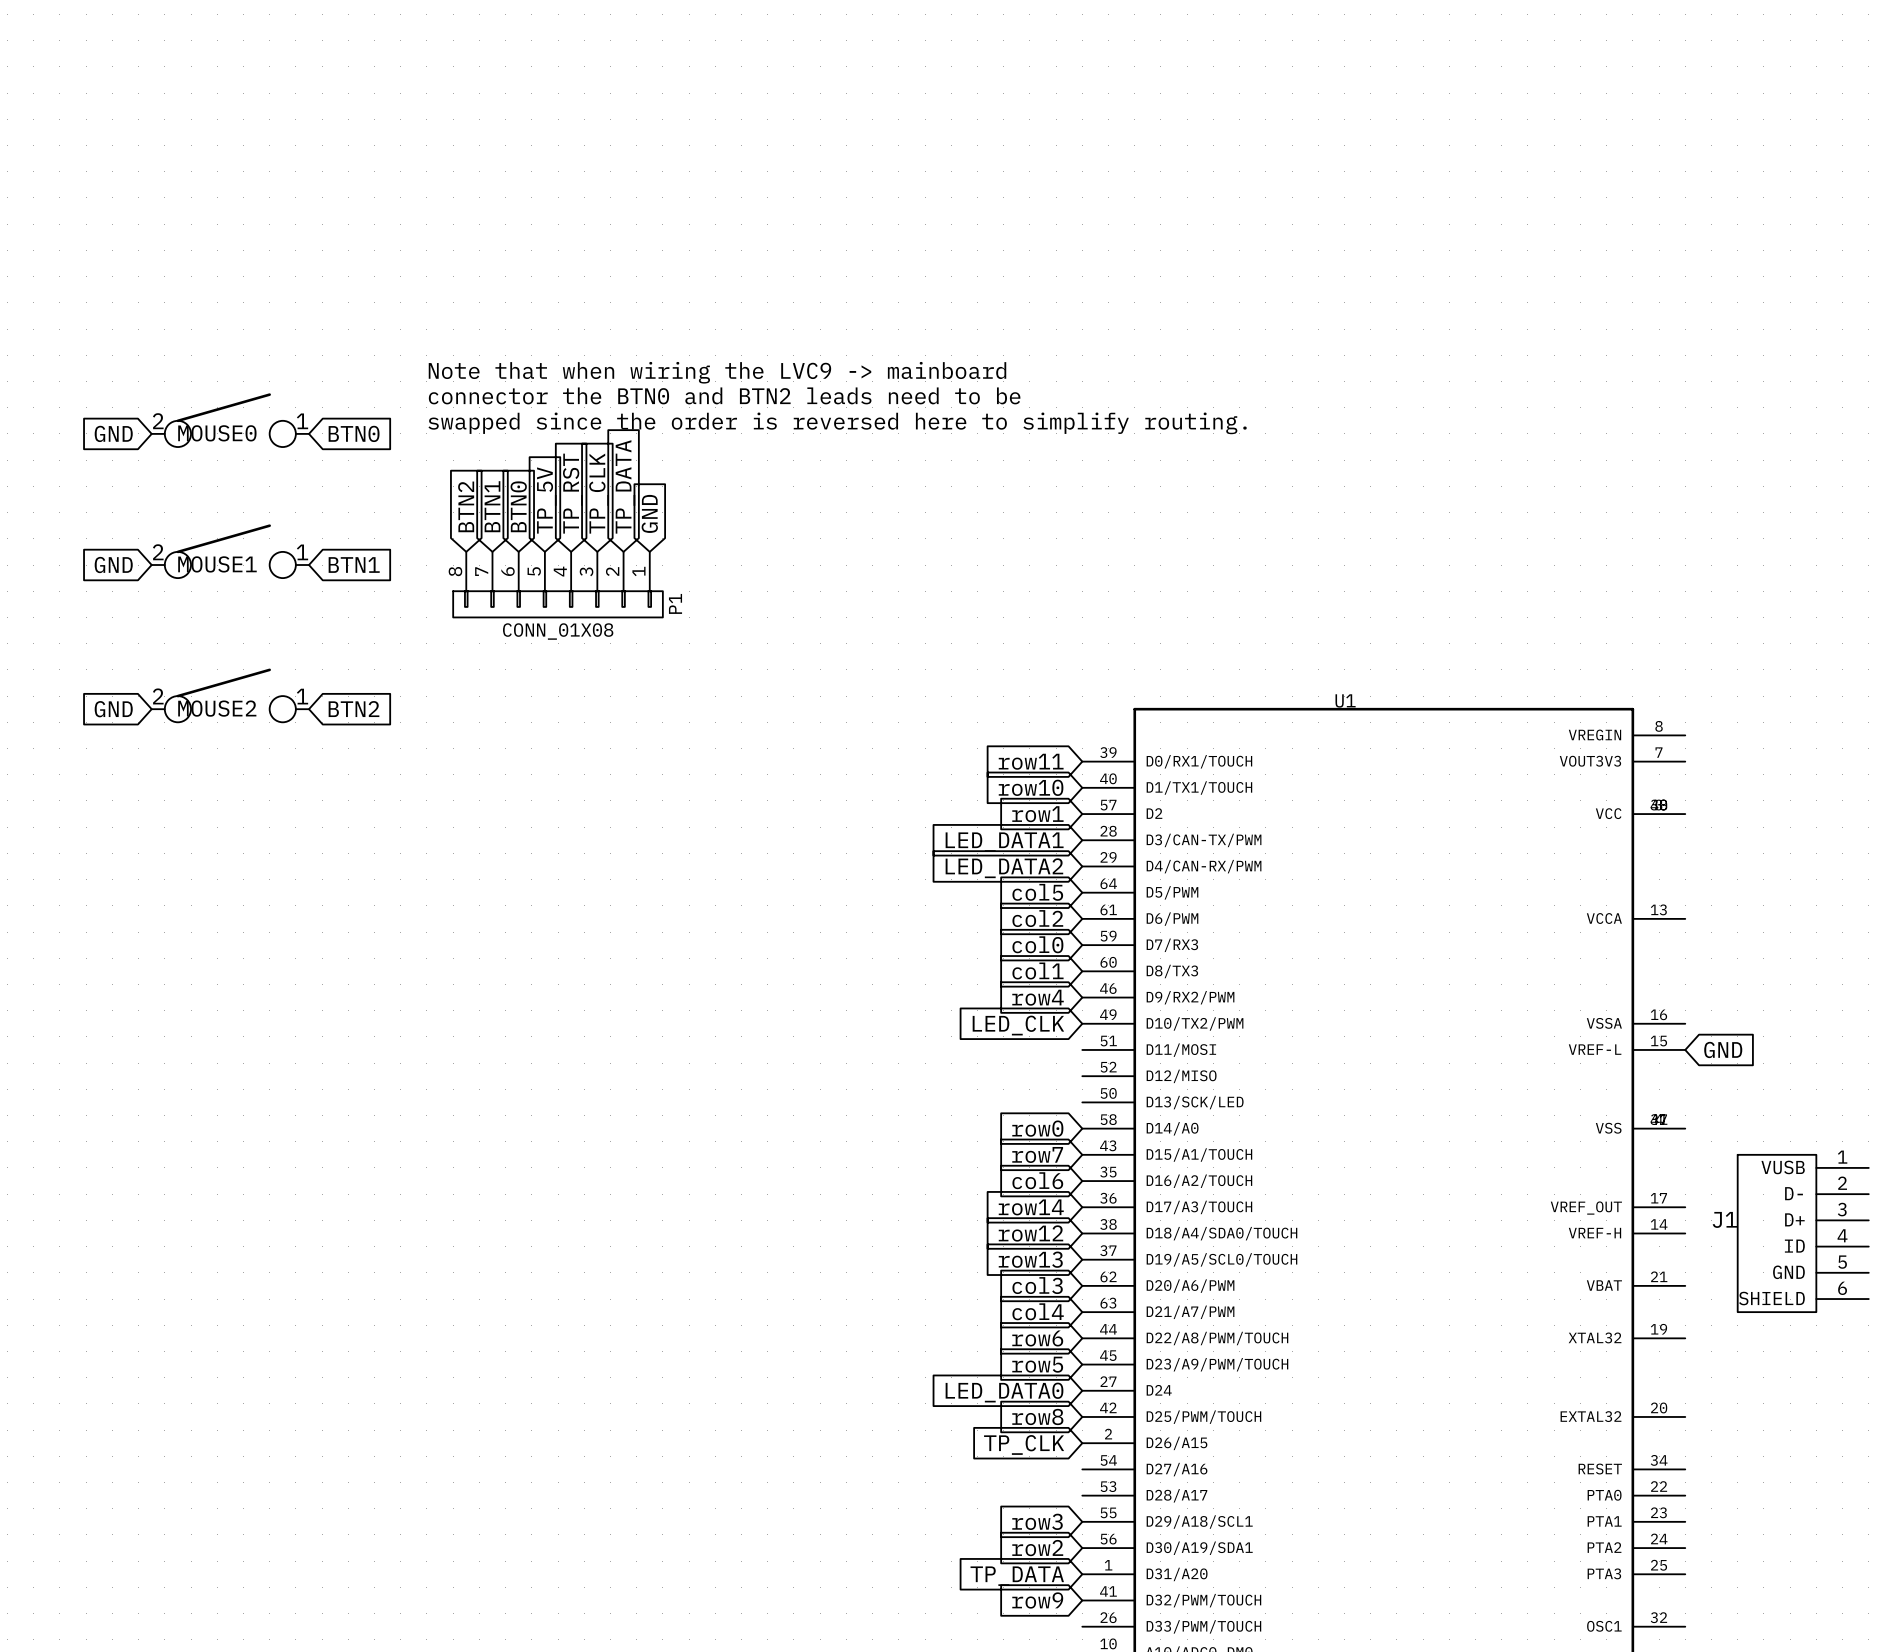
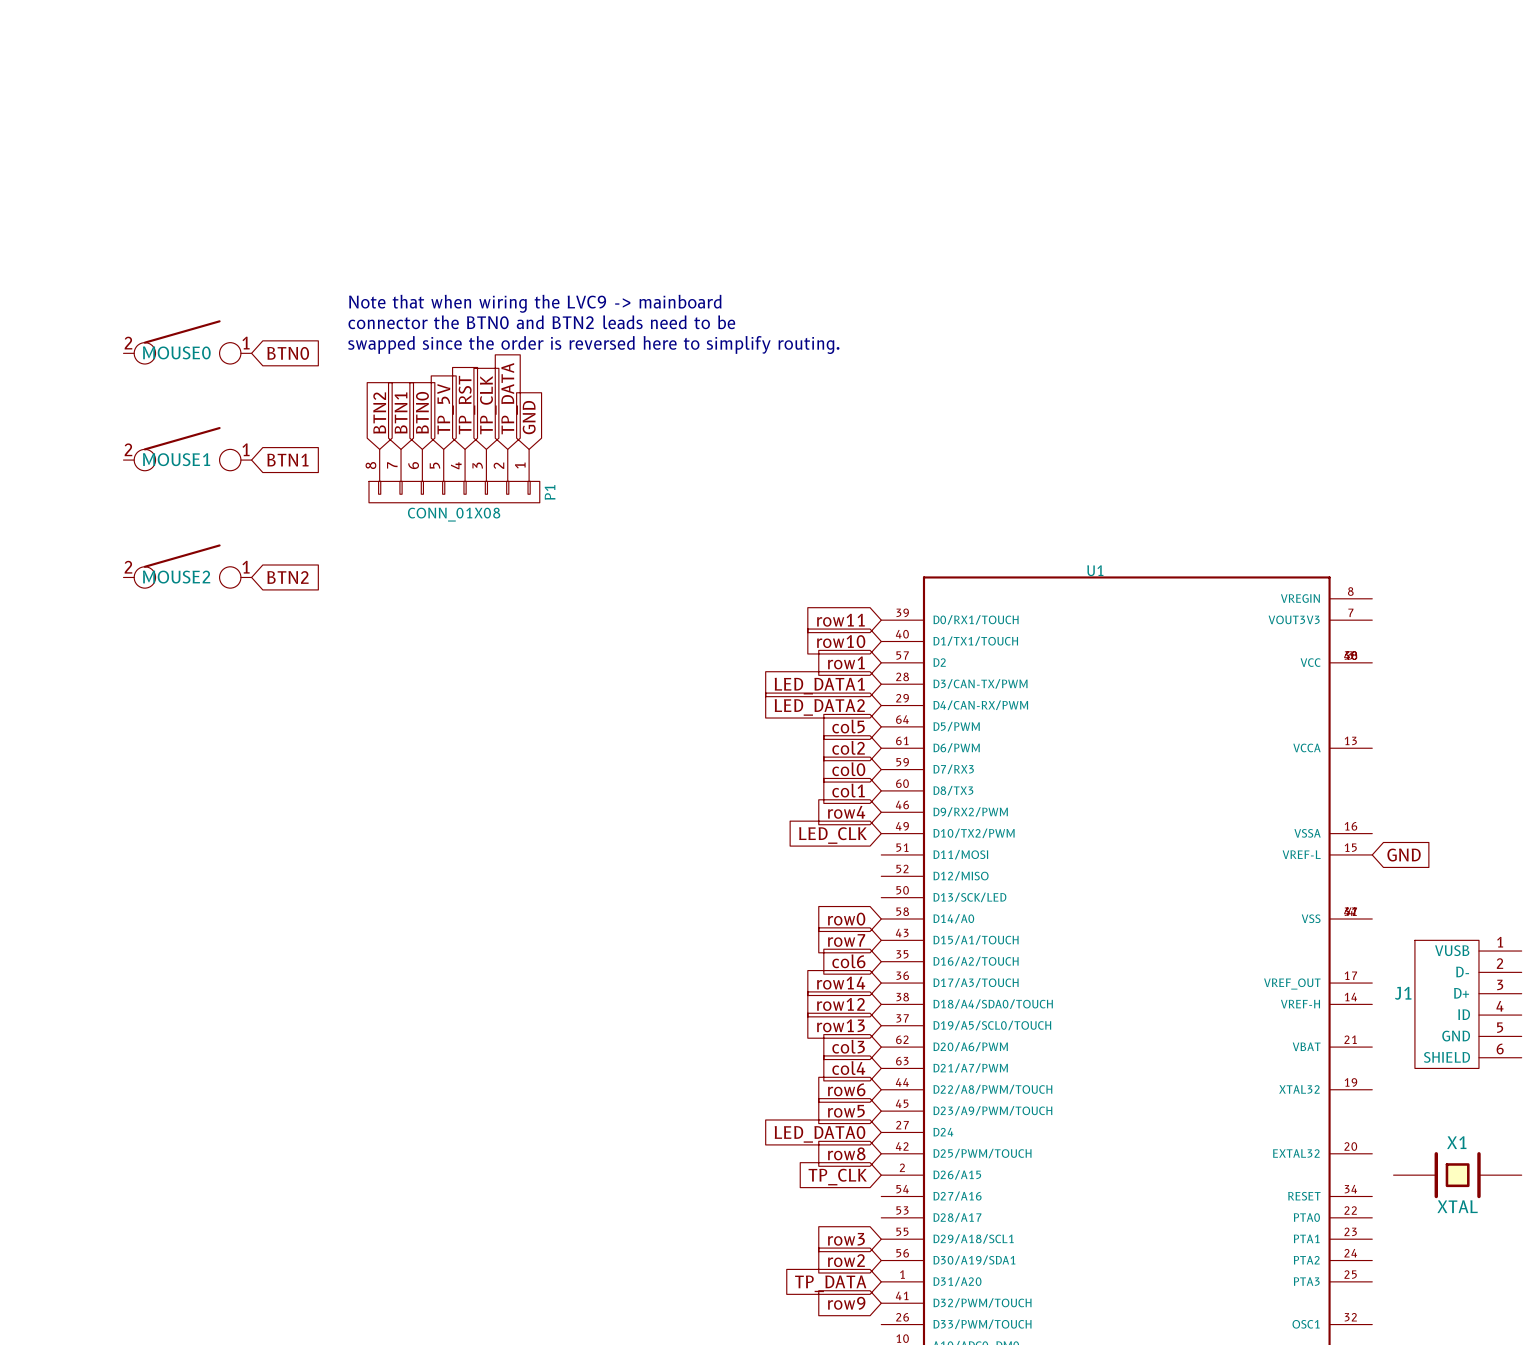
global label: GND (113, 433) -> none
global label: GND (113, 565) -> none
global label: GND (113, 709) -> none
X1: none -> XTAL (1457, 1175)

